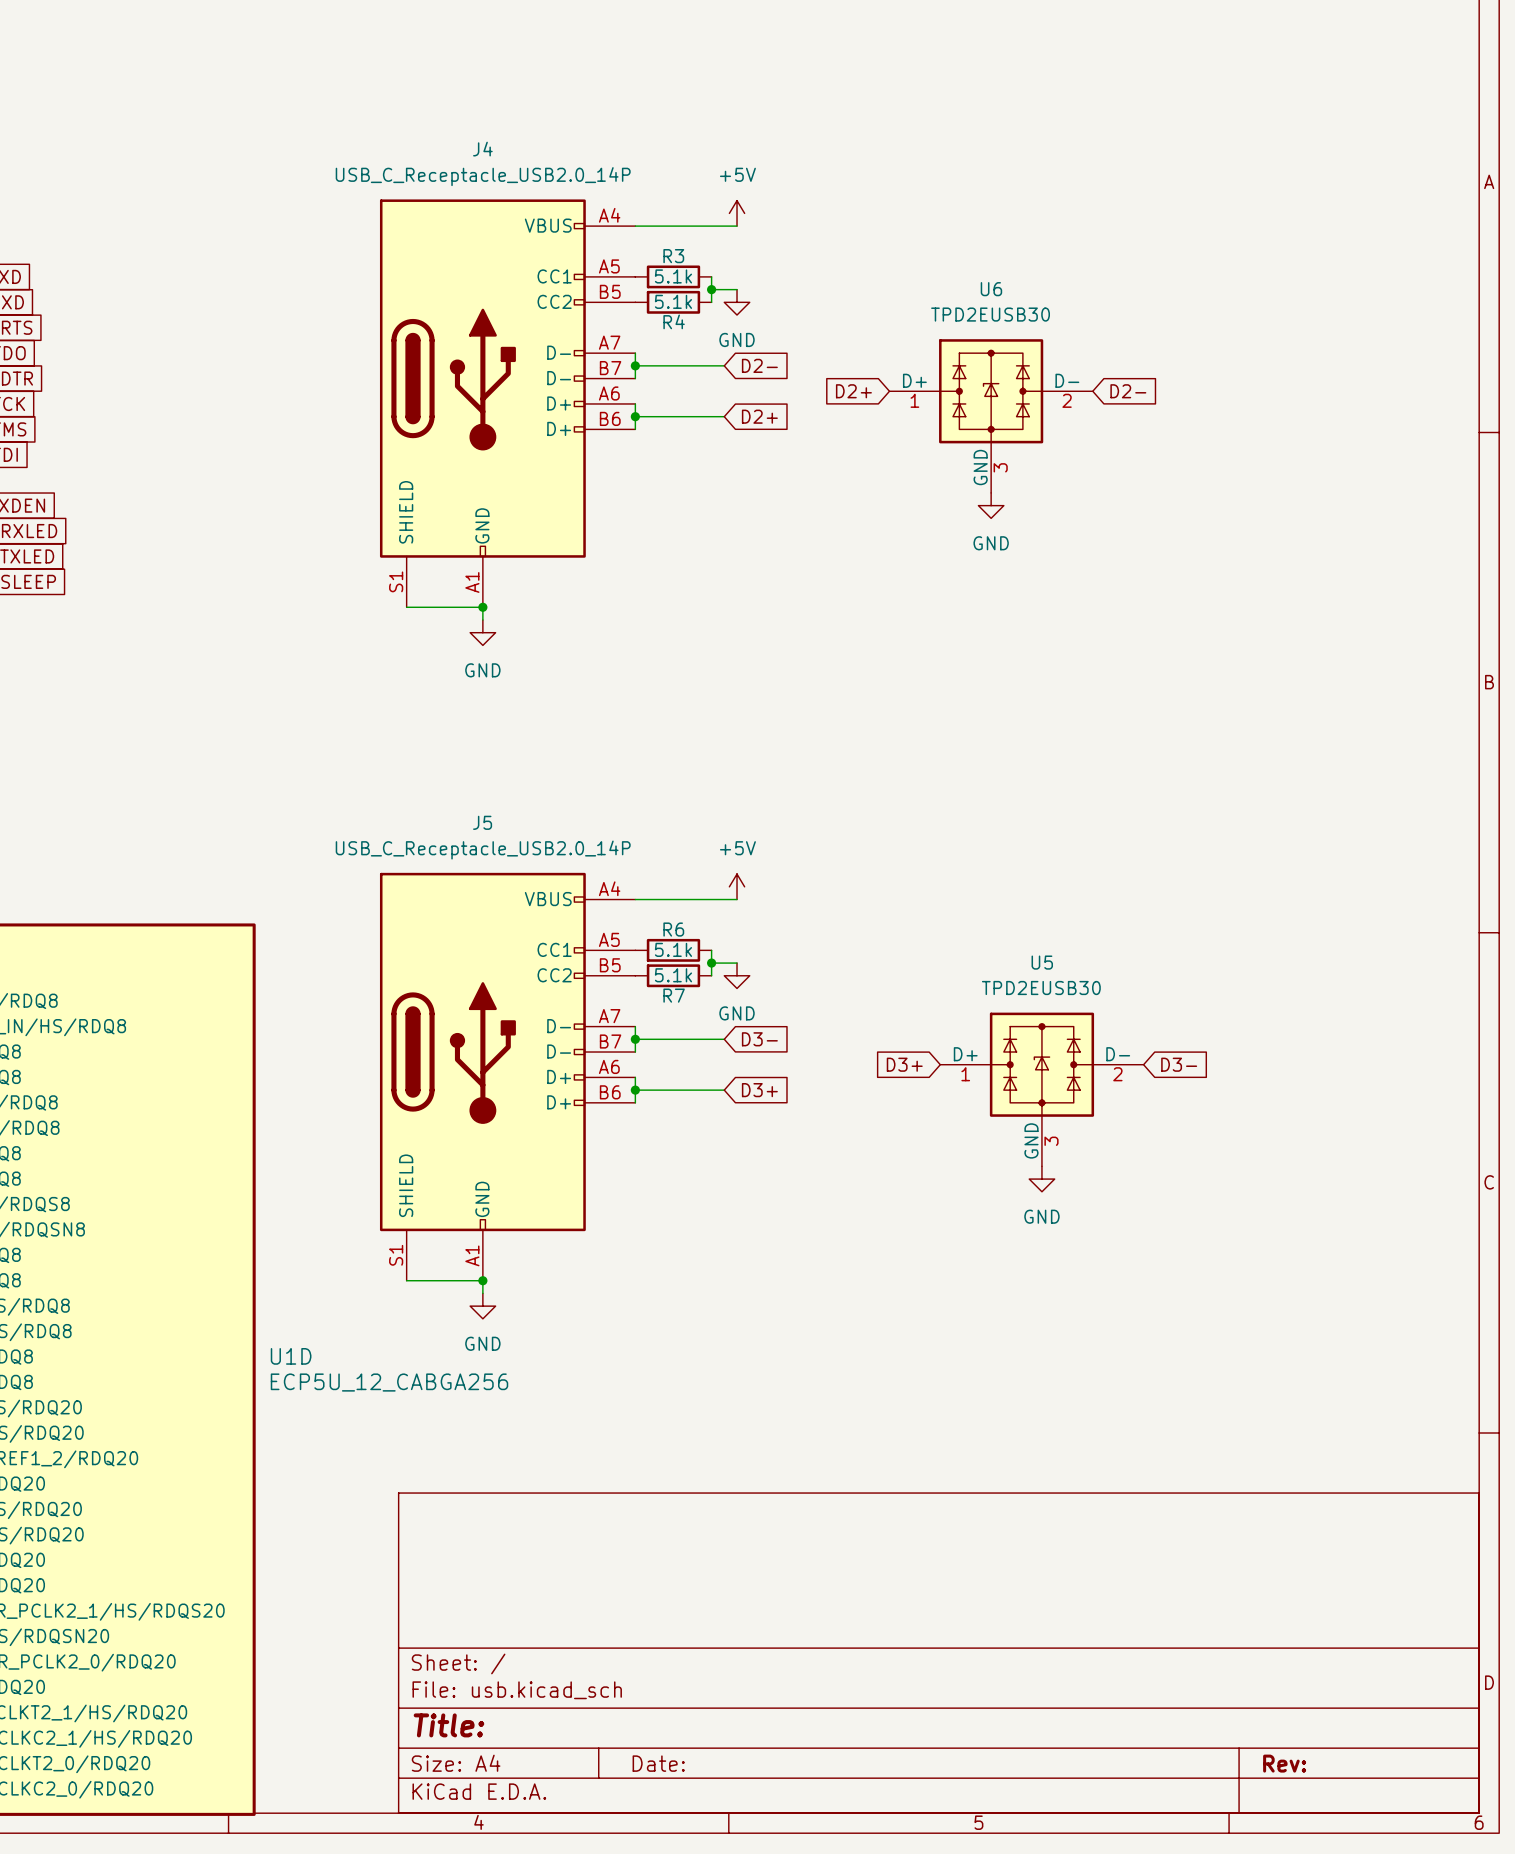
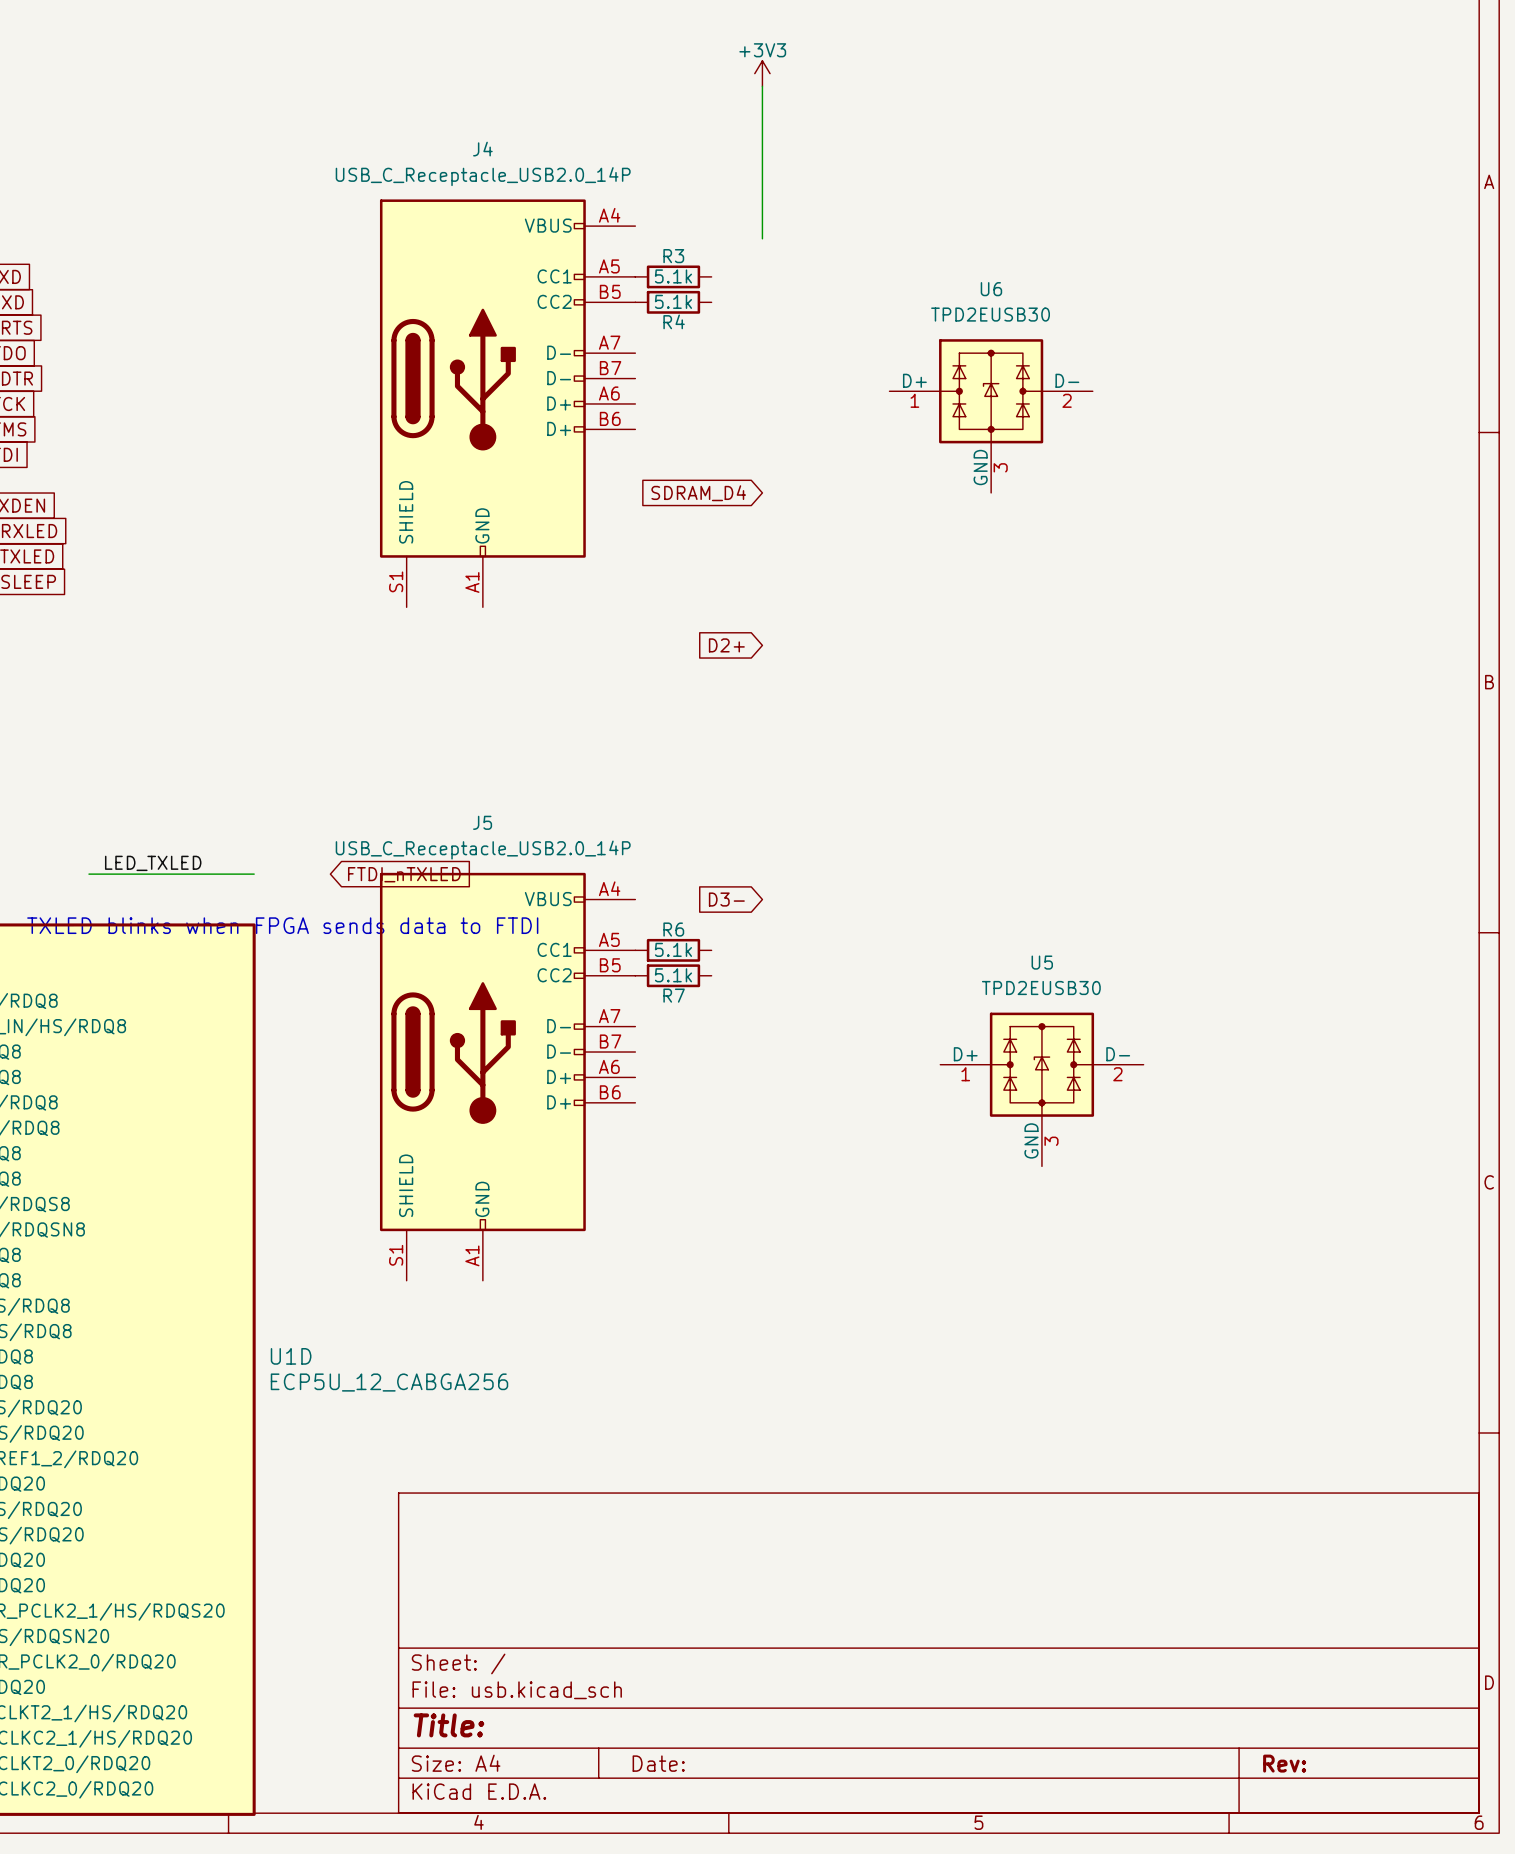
power symbol: none -> +3V3 (762, 73)
wire: none -> (762, 86) (762, 238)
power symbol: +5V (737, 213) -> none
wire: (635, 226) (737, 226) -> none
wire: (711, 276) (711, 302) -> none
wire: (711, 289) (737, 289) -> none
junction: (711, 289) -> none
power symbol: GND (737, 302) -> none
wire: (635, 353) (635, 378) -> none
wire: (635, 365) (724, 365) -> none
junction: (635, 365) -> none
global label: D2- (759, 365) -> none
global label: D2+ (853, 391) -> none
global label: D2- (1128, 391) -> none
wire: (635, 403) (635, 429) -> none
wire: (635, 416) (724, 416) -> none
junction: (635, 416) -> none
global label: D2+ (759, 416) -> none
global label: none -> SDRAM_D4 (698, 493)
power symbol: GND (991, 505) -> none
wire: (406, 607) (482, 607) (482, 619) -> none
junction: (482, 607) -> none
power symbol: GND (482, 632) -> none
global label: none -> D2+ (726, 645)
label: none -> LED_TXLED (153, 863)
wire: none -> (88, 874) (254, 874)
global label: none -> FTDI_nTXLED (404, 874)
power symbol: +5V (737, 886) -> none
wire: (635, 899) (737, 899) -> none
text: none -> TXLED blinks when FPGA sends data to FTDI (282, 925)
wire: (711, 950) (711, 975) -> none
wire: (711, 963) (737, 963) -> none
junction: (711, 963) -> none
power symbol: GND (737, 975) -> none
wire: (635, 1026) (635, 1052) -> none
wire: (635, 1039) (724, 1039) -> none
junction: (635, 1039) -> none
global label rotation: 0° (759, 1039) -> 180° (726, 899)
global label position: D3- (759, 1039) -> D3- (726, 899)
global label: D3+ (904, 1064) -> none
global label: D3- (1179, 1064) -> none
wire: (635, 1077) (635, 1102) -> none
wire: (635, 1090) (724, 1090) -> none
junction: (635, 1090) -> none
global label: D3+ (759, 1090) -> none
power symbol: GND (1041, 1179) -> none
wire: (406, 1280) (482, 1280) (482, 1293) -> none
junction: (482, 1280) -> none
power symbol: GND (482, 1306) -> none

